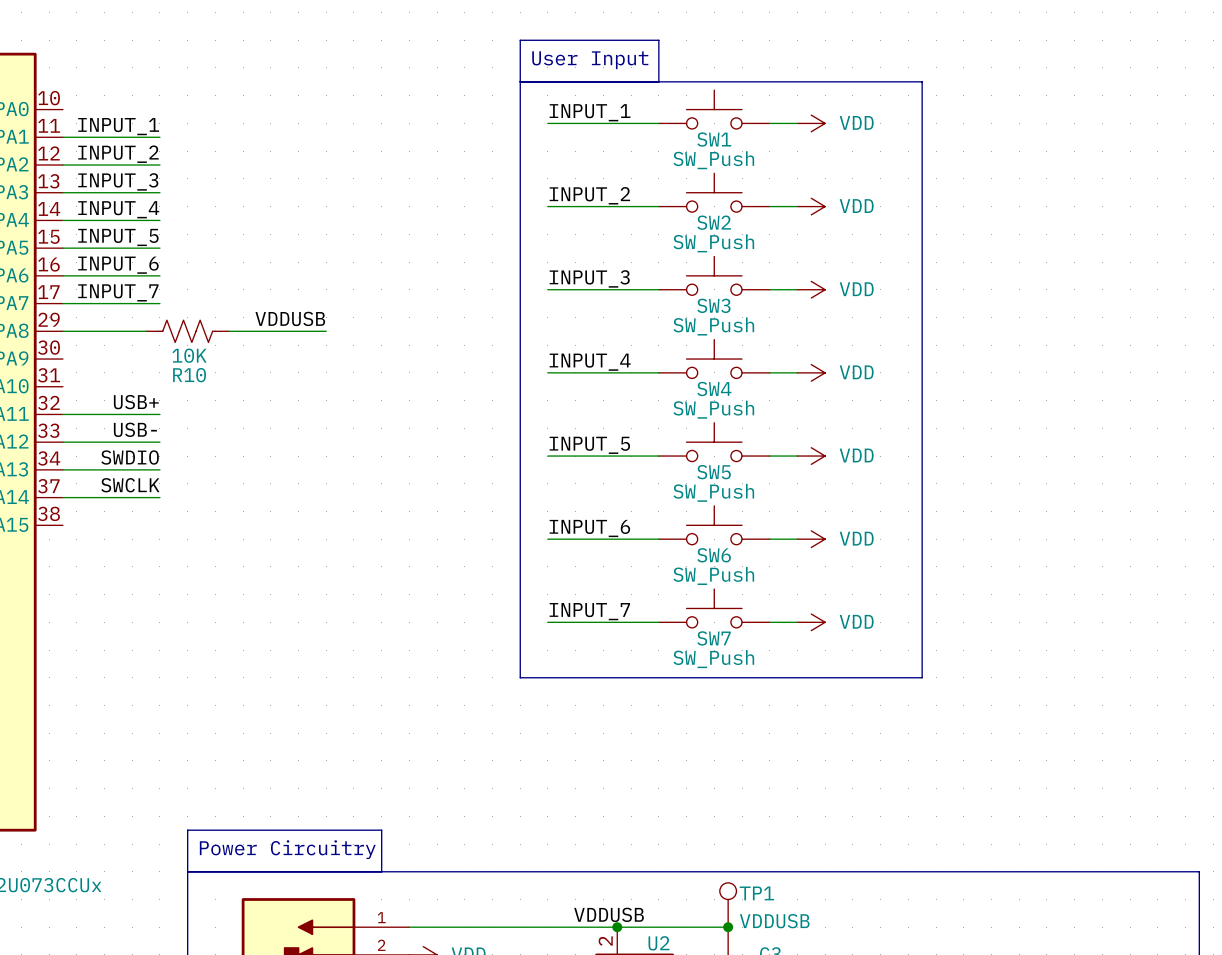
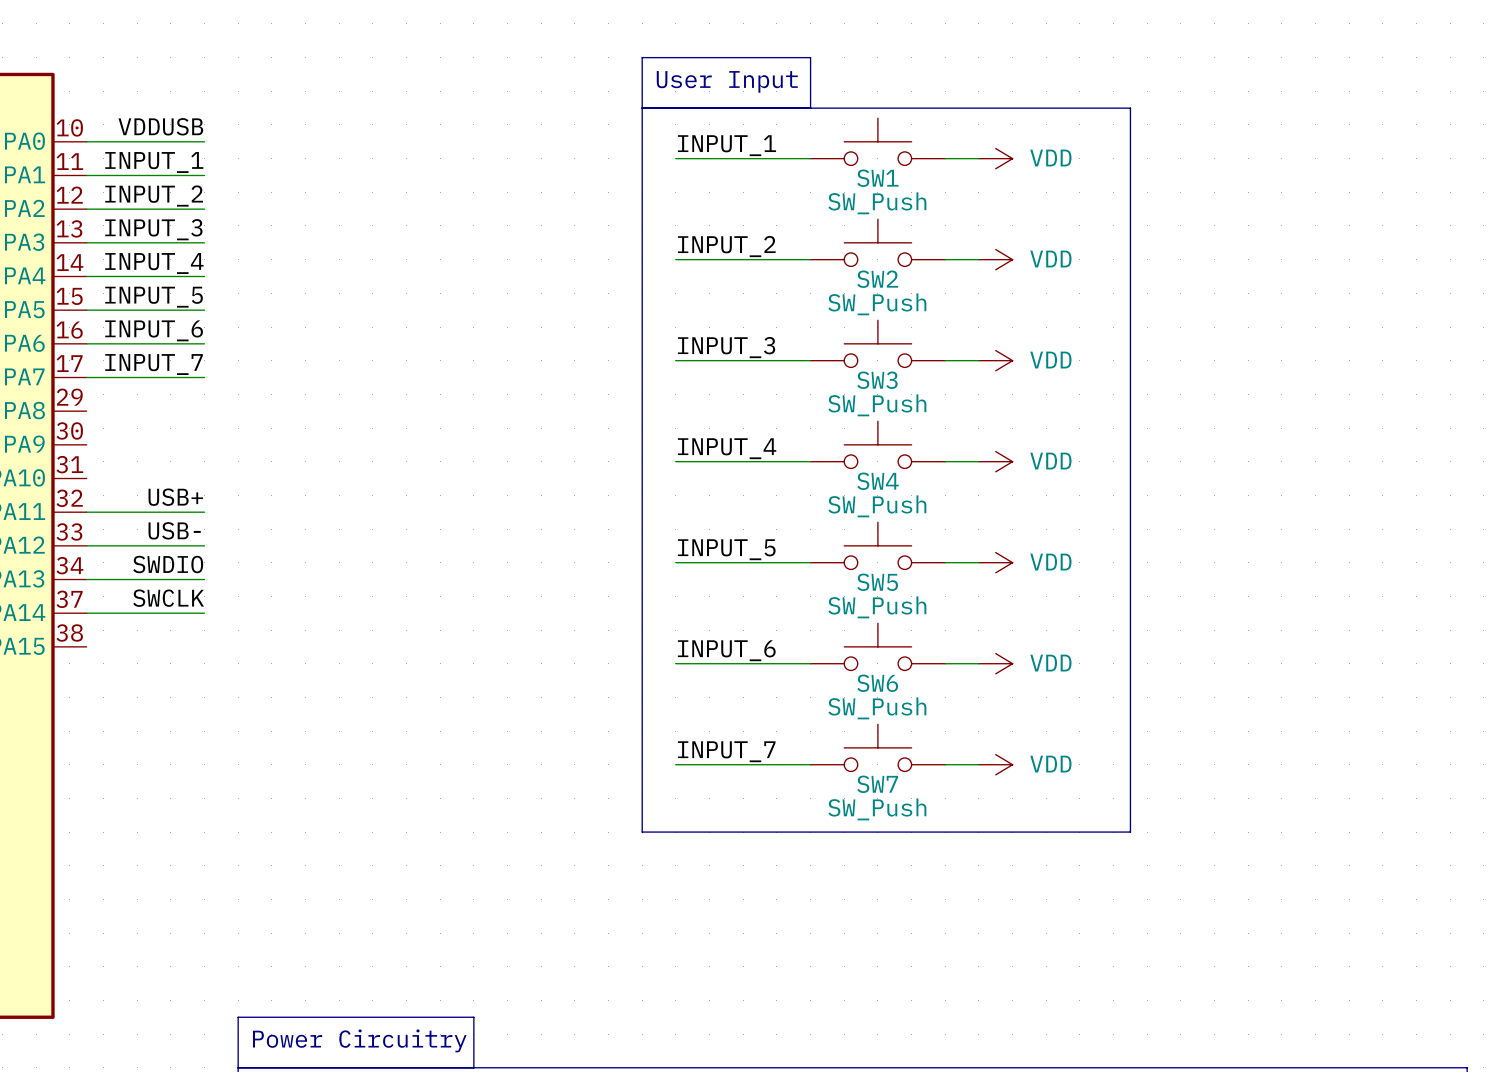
label: none -> VDDUSB (160, 126)
wire: none -> (86, 141) (204, 141)
label: VDDUSB (290, 318) -> none
wire: (62, 331) (146, 331) -> none
R10: 10K (187, 331) -> none
wire: (229, 331) (326, 331) -> none

